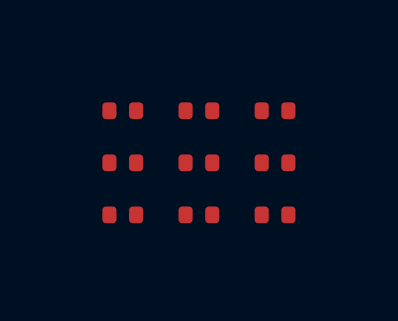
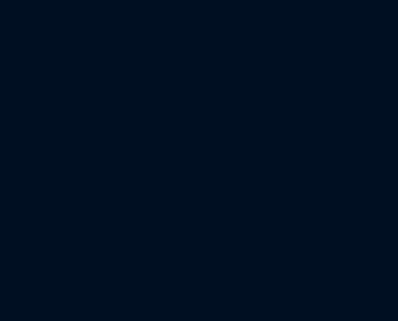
part: (122, 110) -> none
part: (198, 110) -> none
part: (275, 110) -> none
part: (122, 162) -> none
part: (198, 162) -> none
part: (275, 162) -> none
part: (122, 214) -> none
part: (198, 214) -> none
part: (275, 214) -> none

